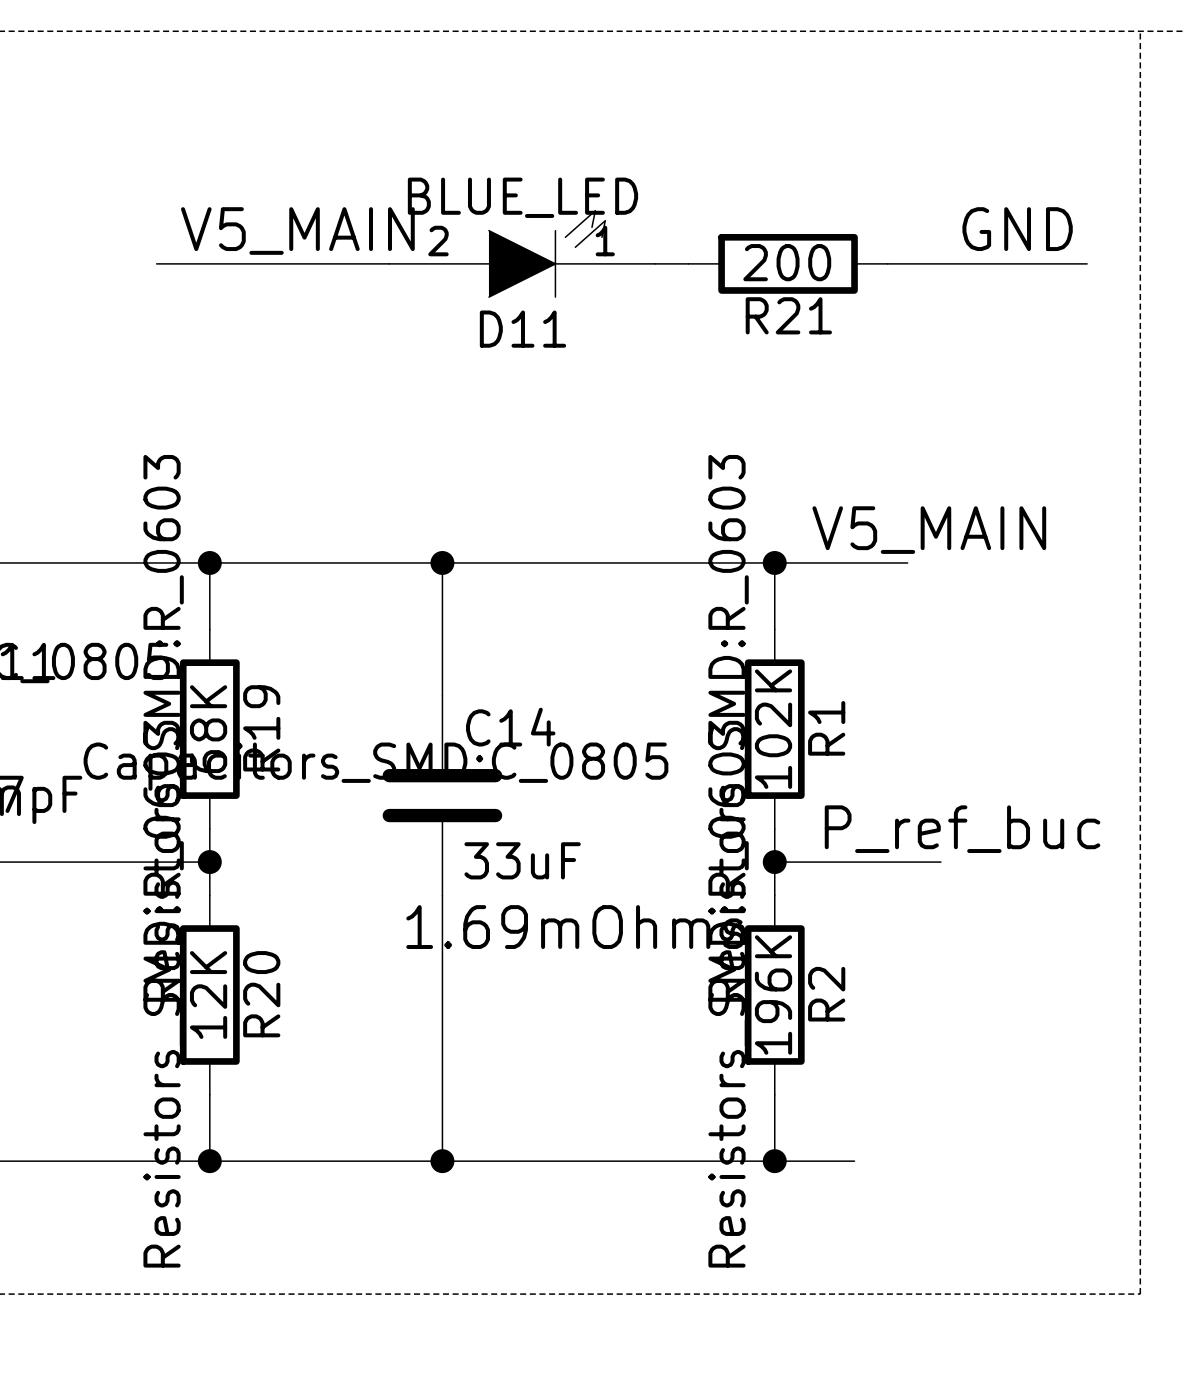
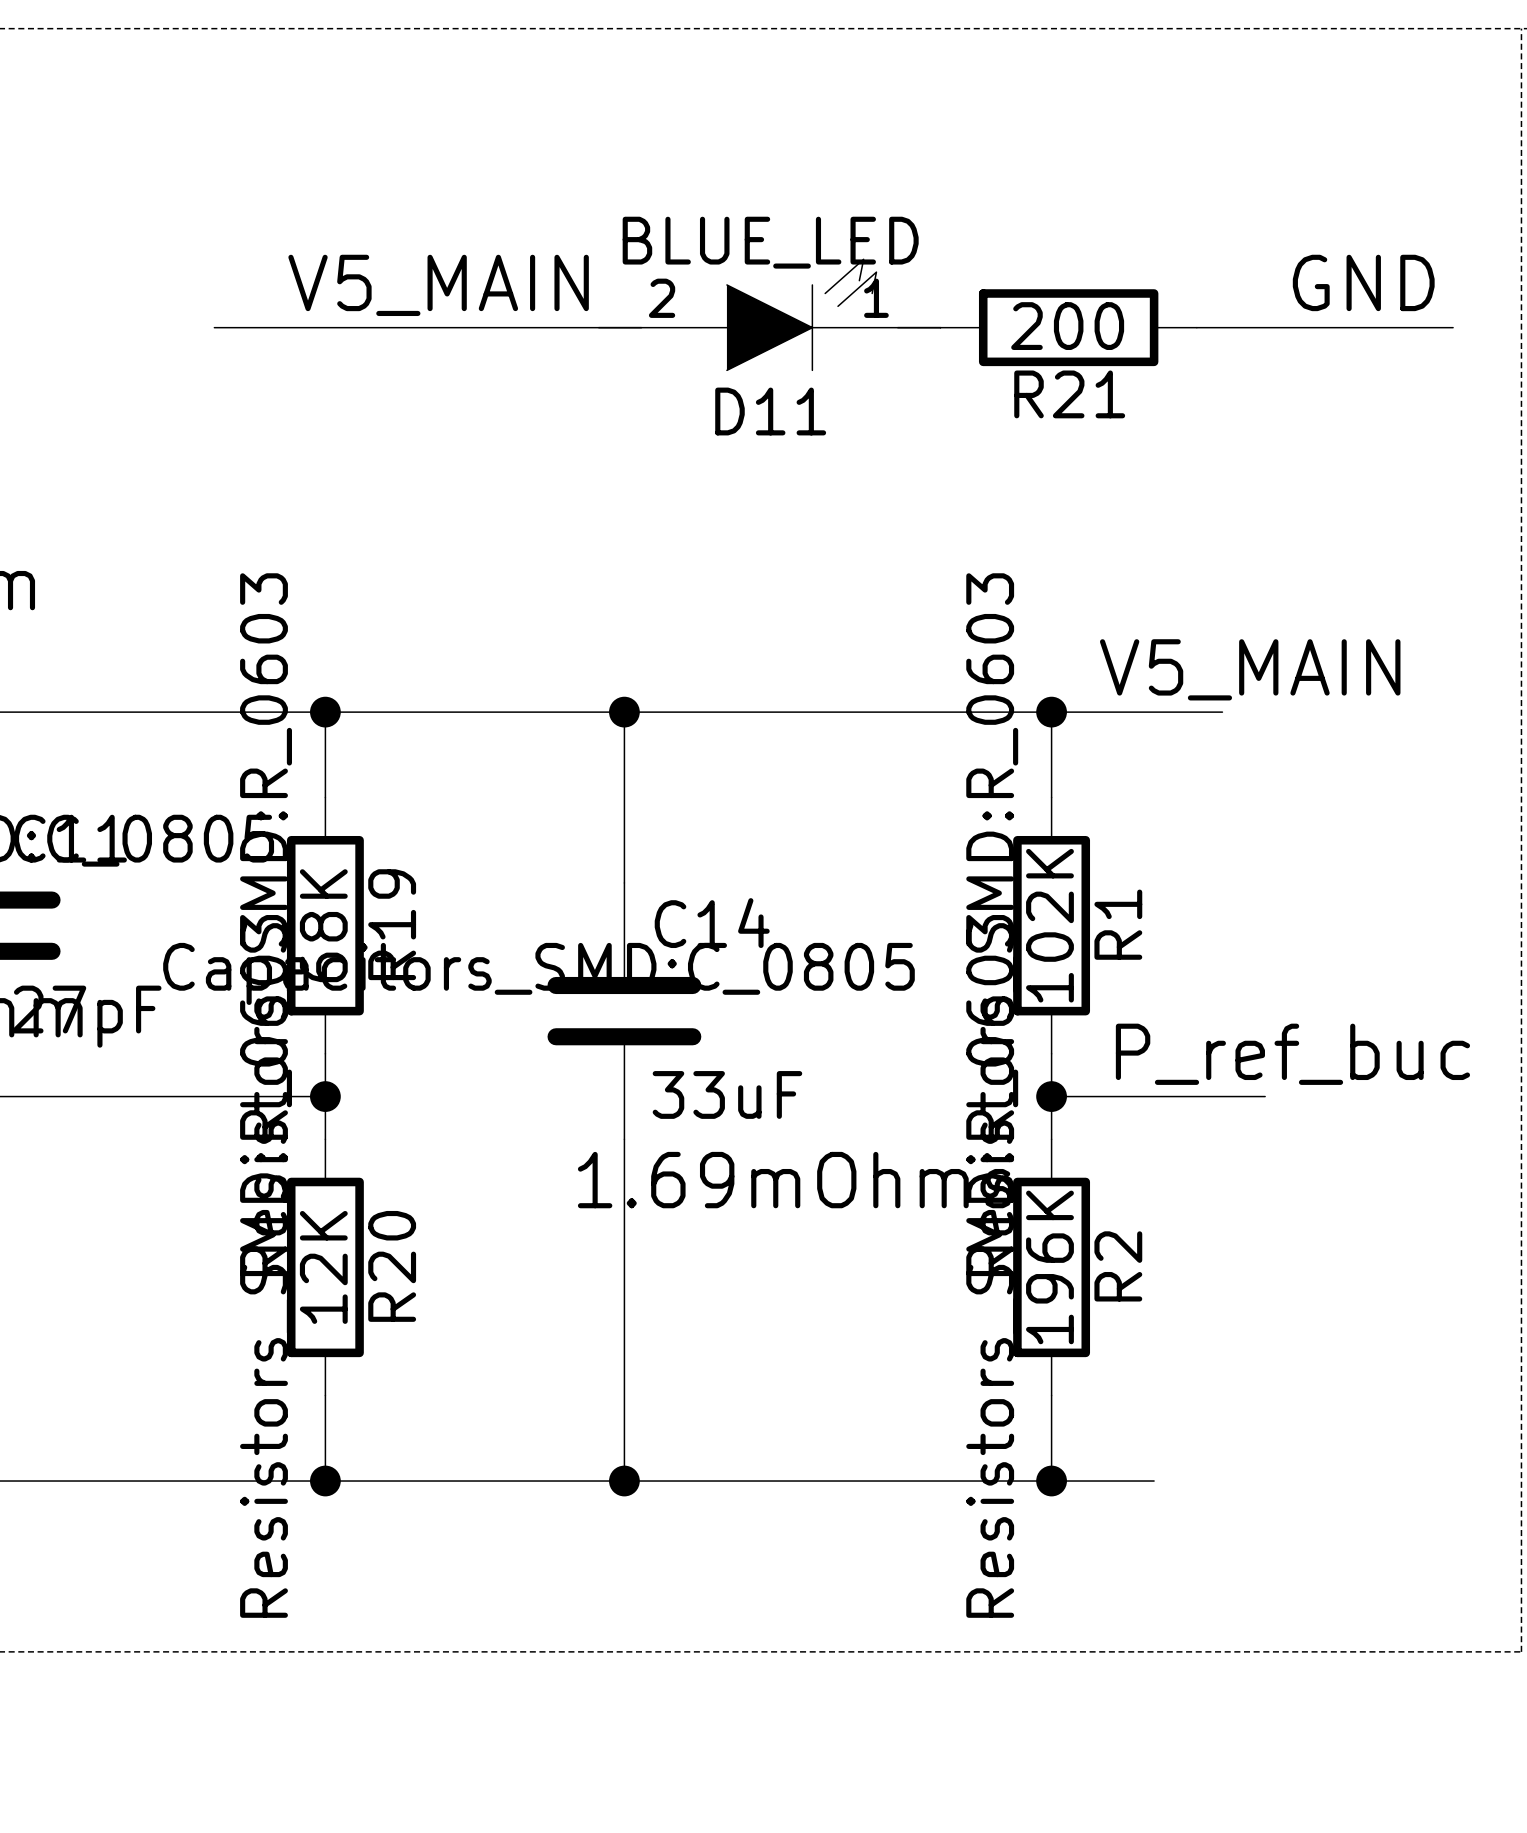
D11 position: (522, 253) -> (769, 314)
wire: none -> (214, 327) (257, 327)

